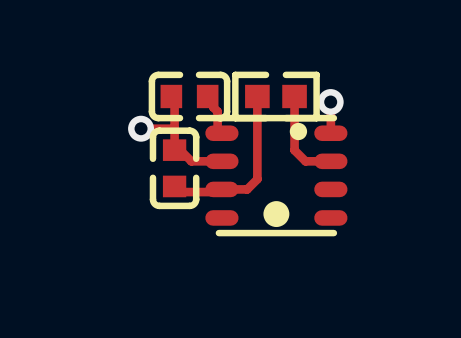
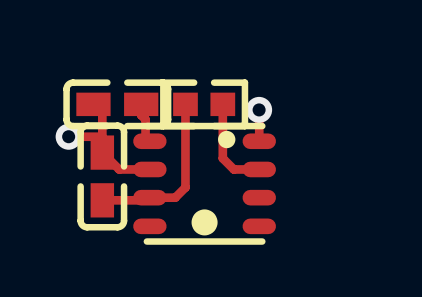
part footprint: [148, 71, 231, 122] -> [63, 79, 172, 130]
part footprint: [149, 127, 200, 210] -> [77, 122, 128, 231]

